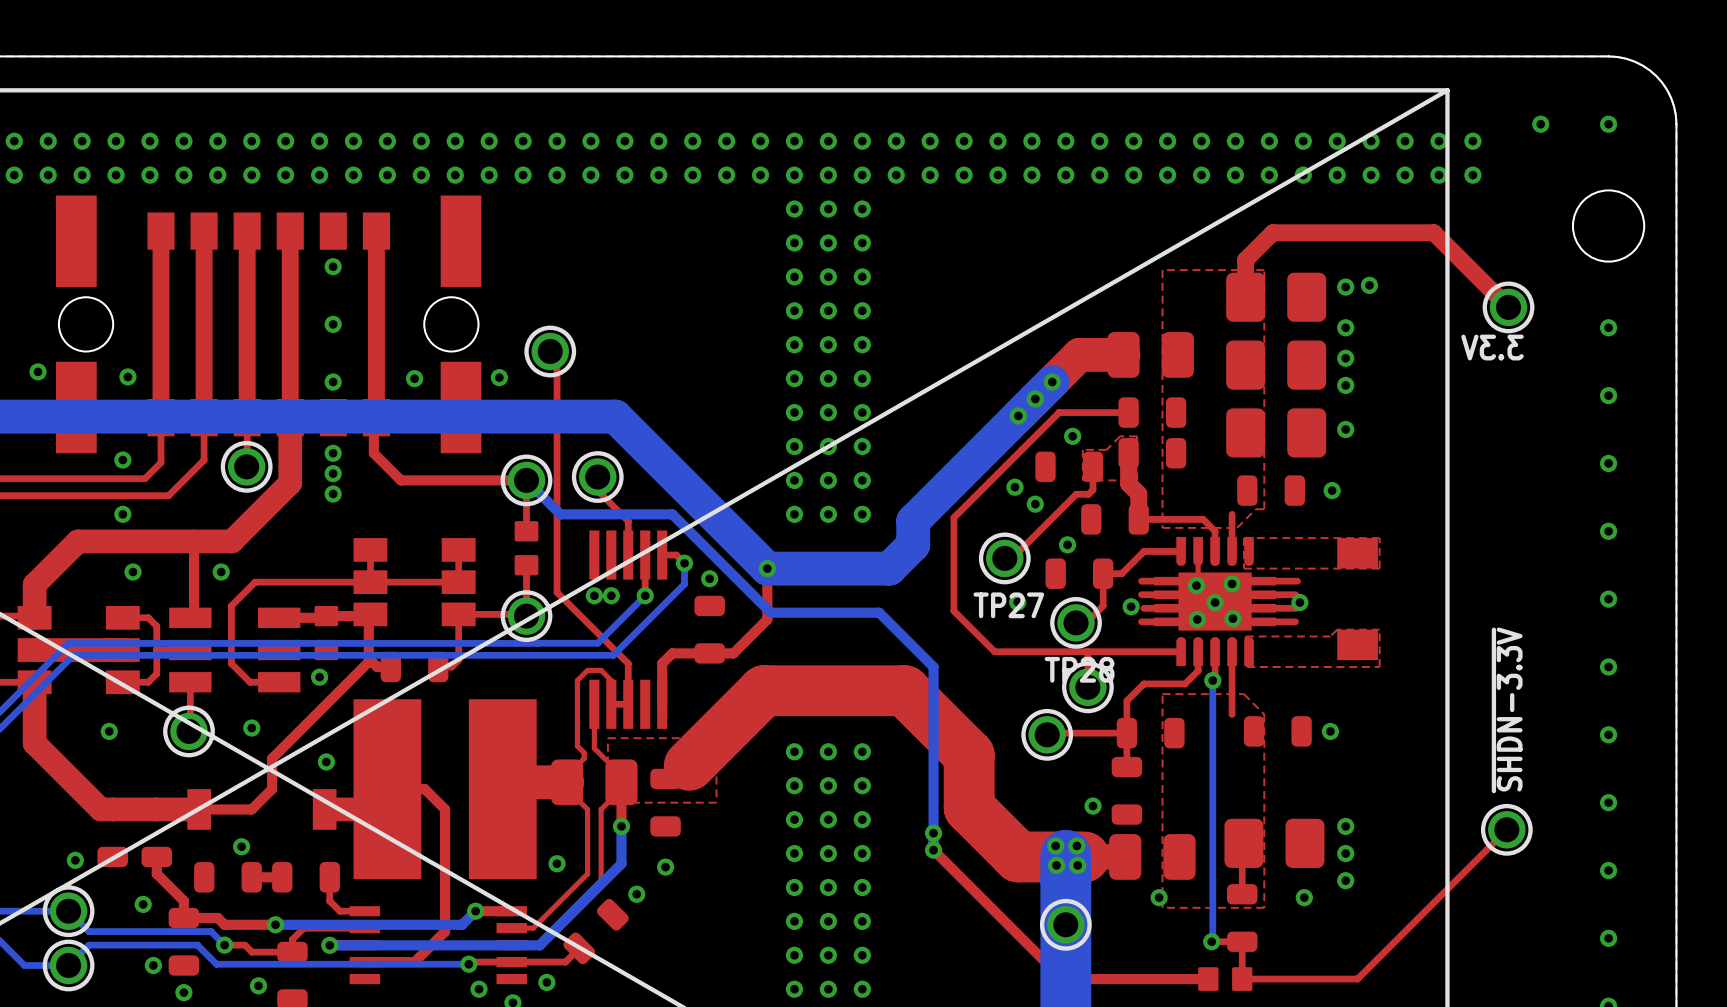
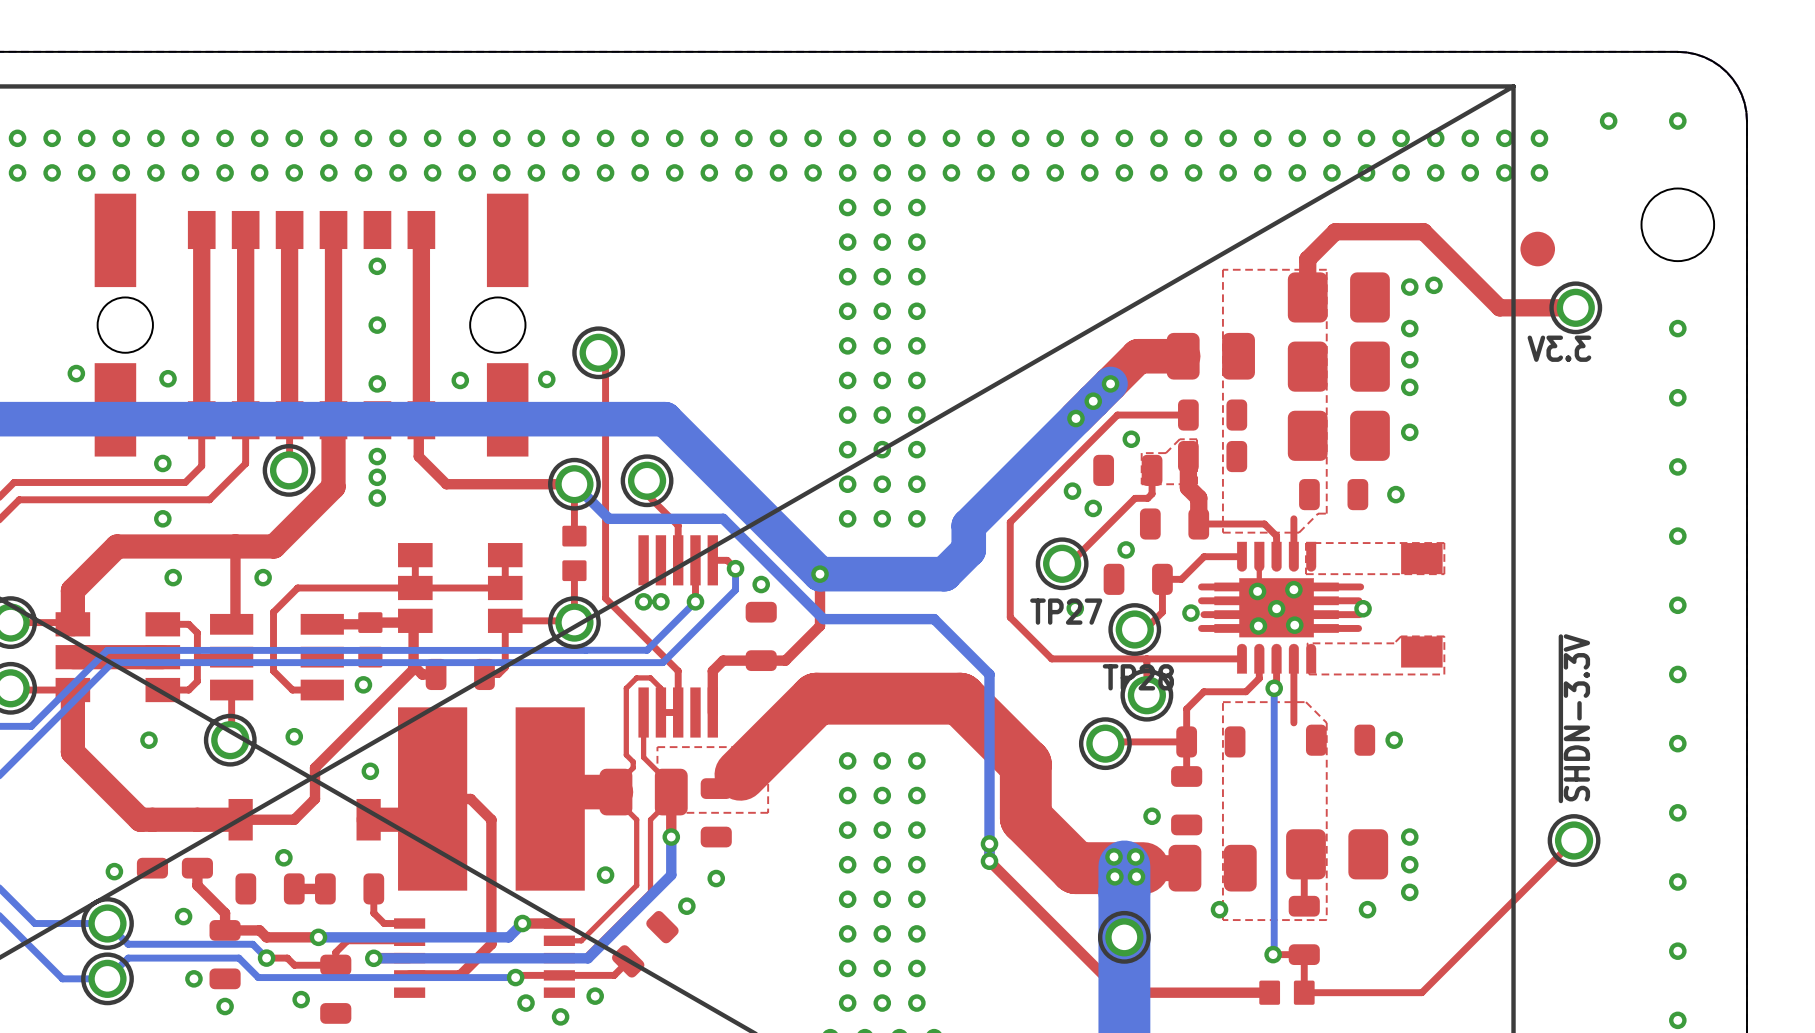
top track: (1359, 232) (1433, 232) (1508, 307) -> (1423, 231) (1499, 307) (1575, 307)
part: none -> (1537, 249)

